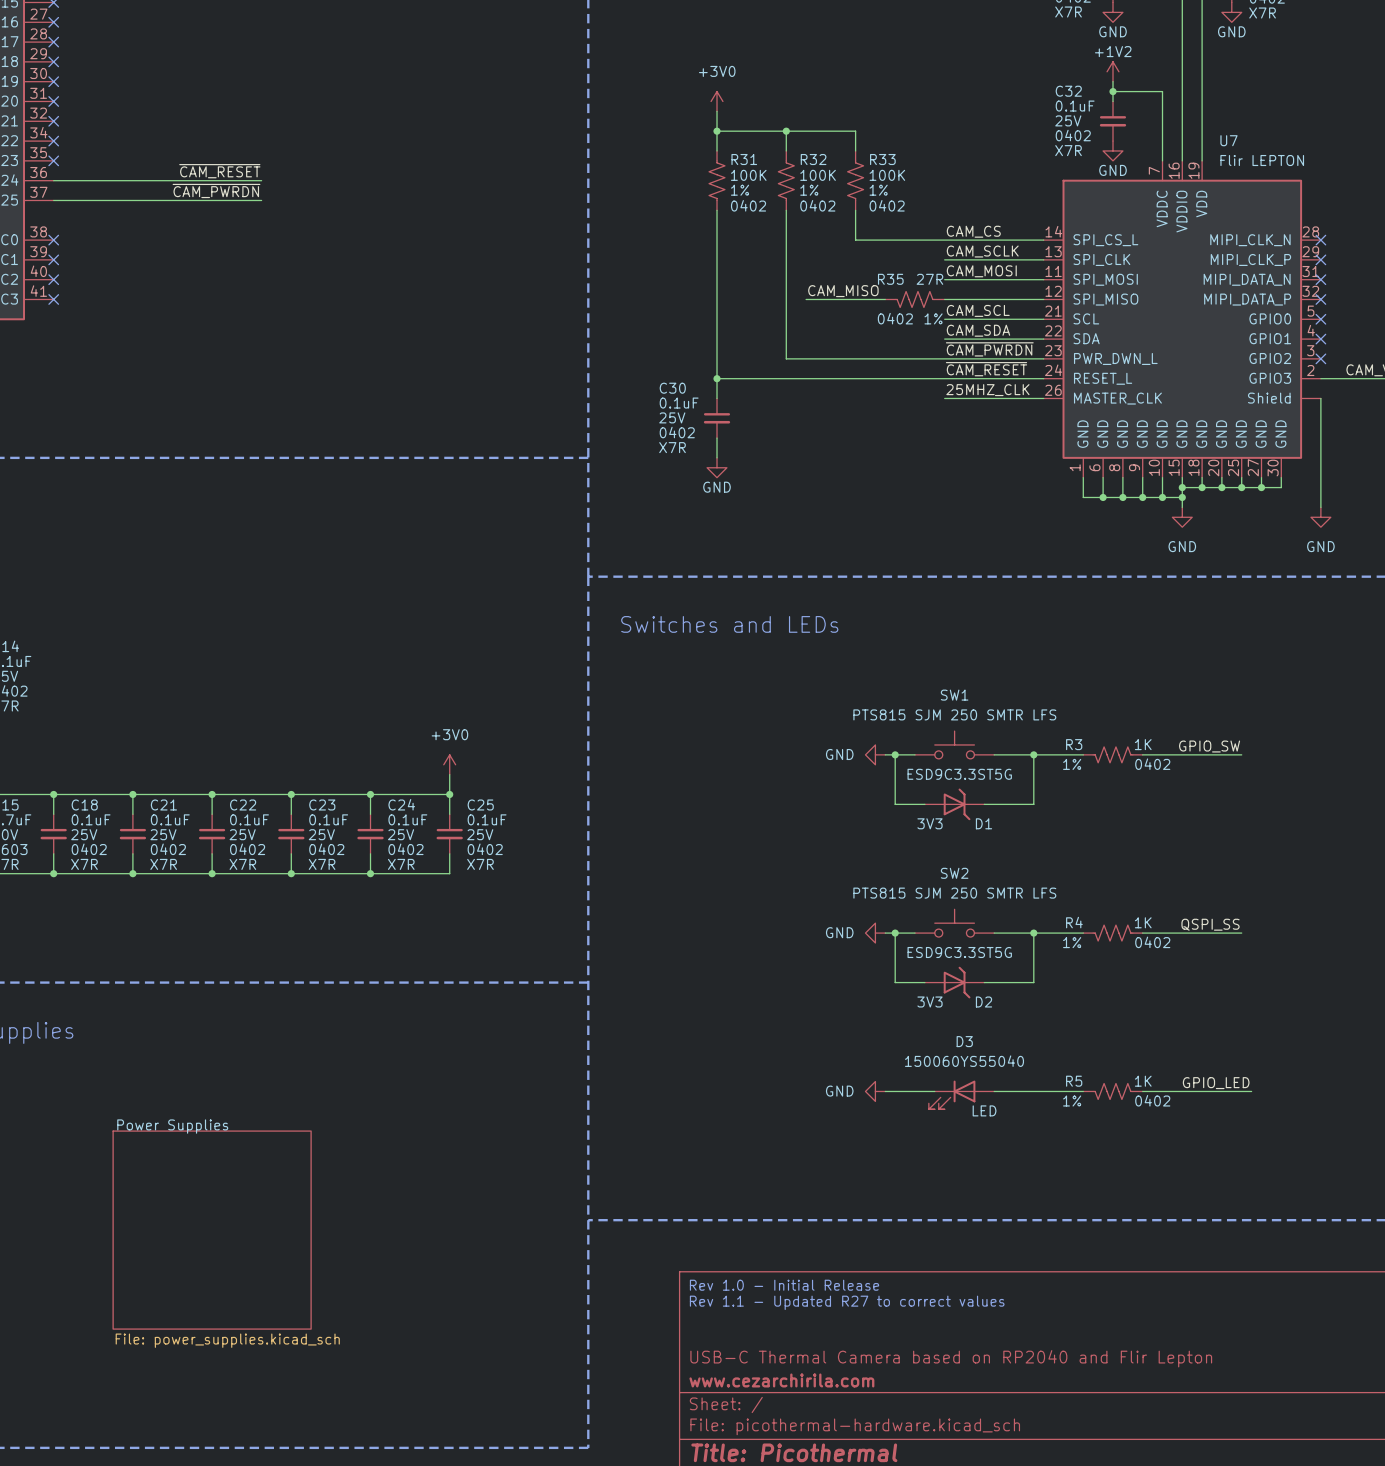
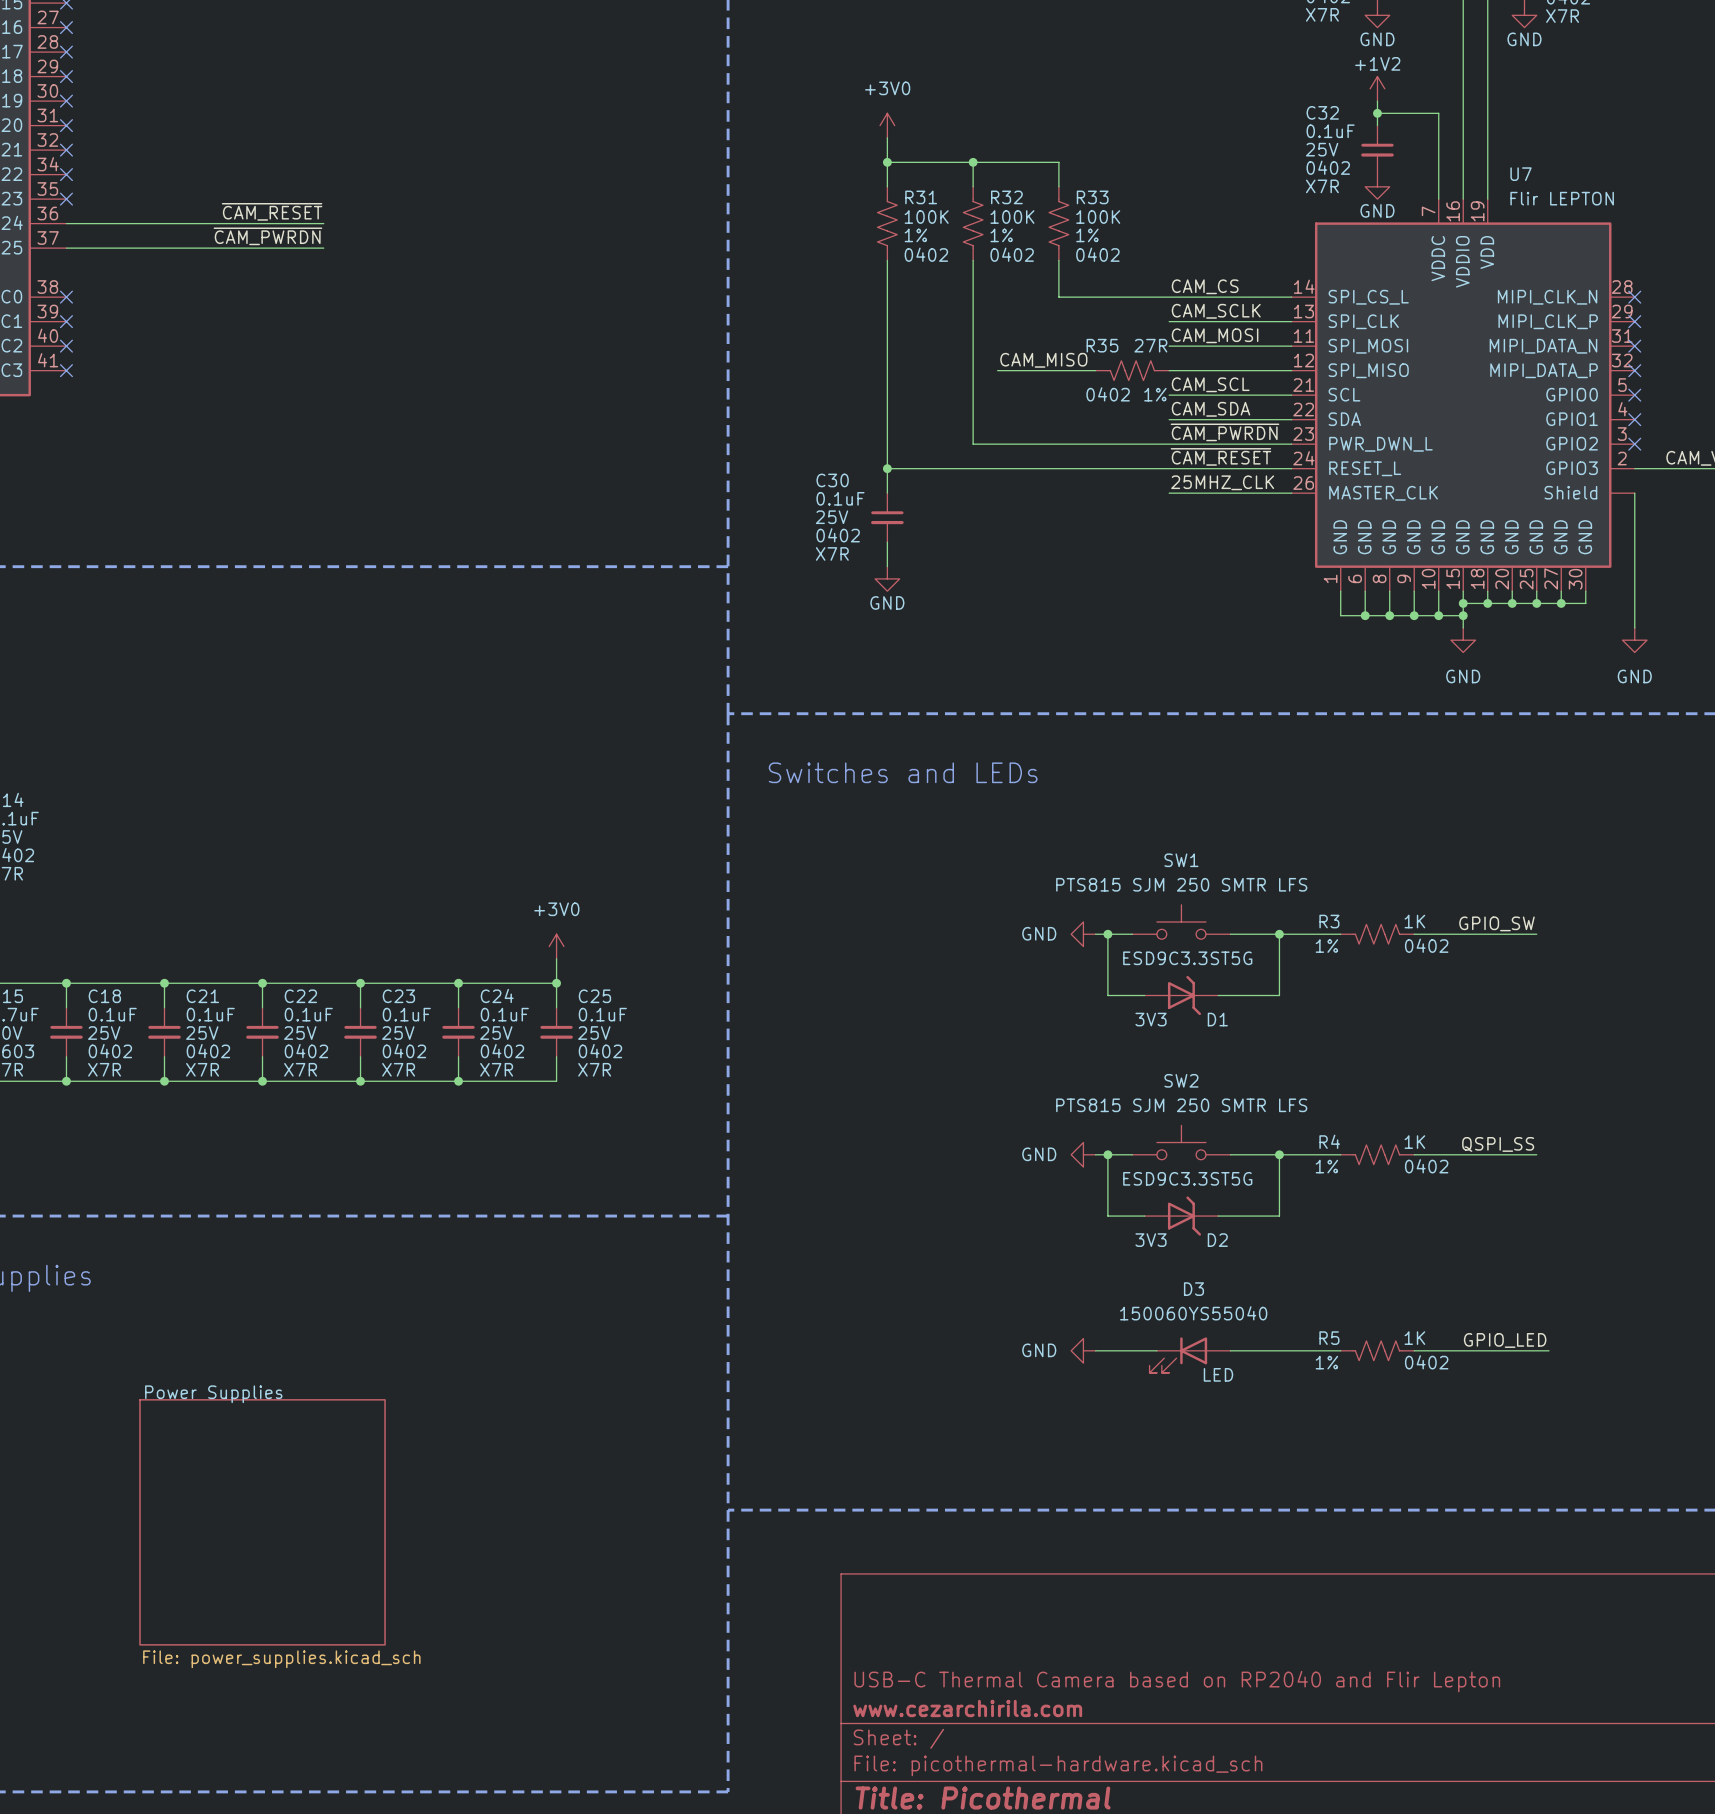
text: Rev 1.0 - Initial Release (784, 1285) -> none
text: Rev 1.1 - Updated R27 to correct values (847, 1302) -> none

